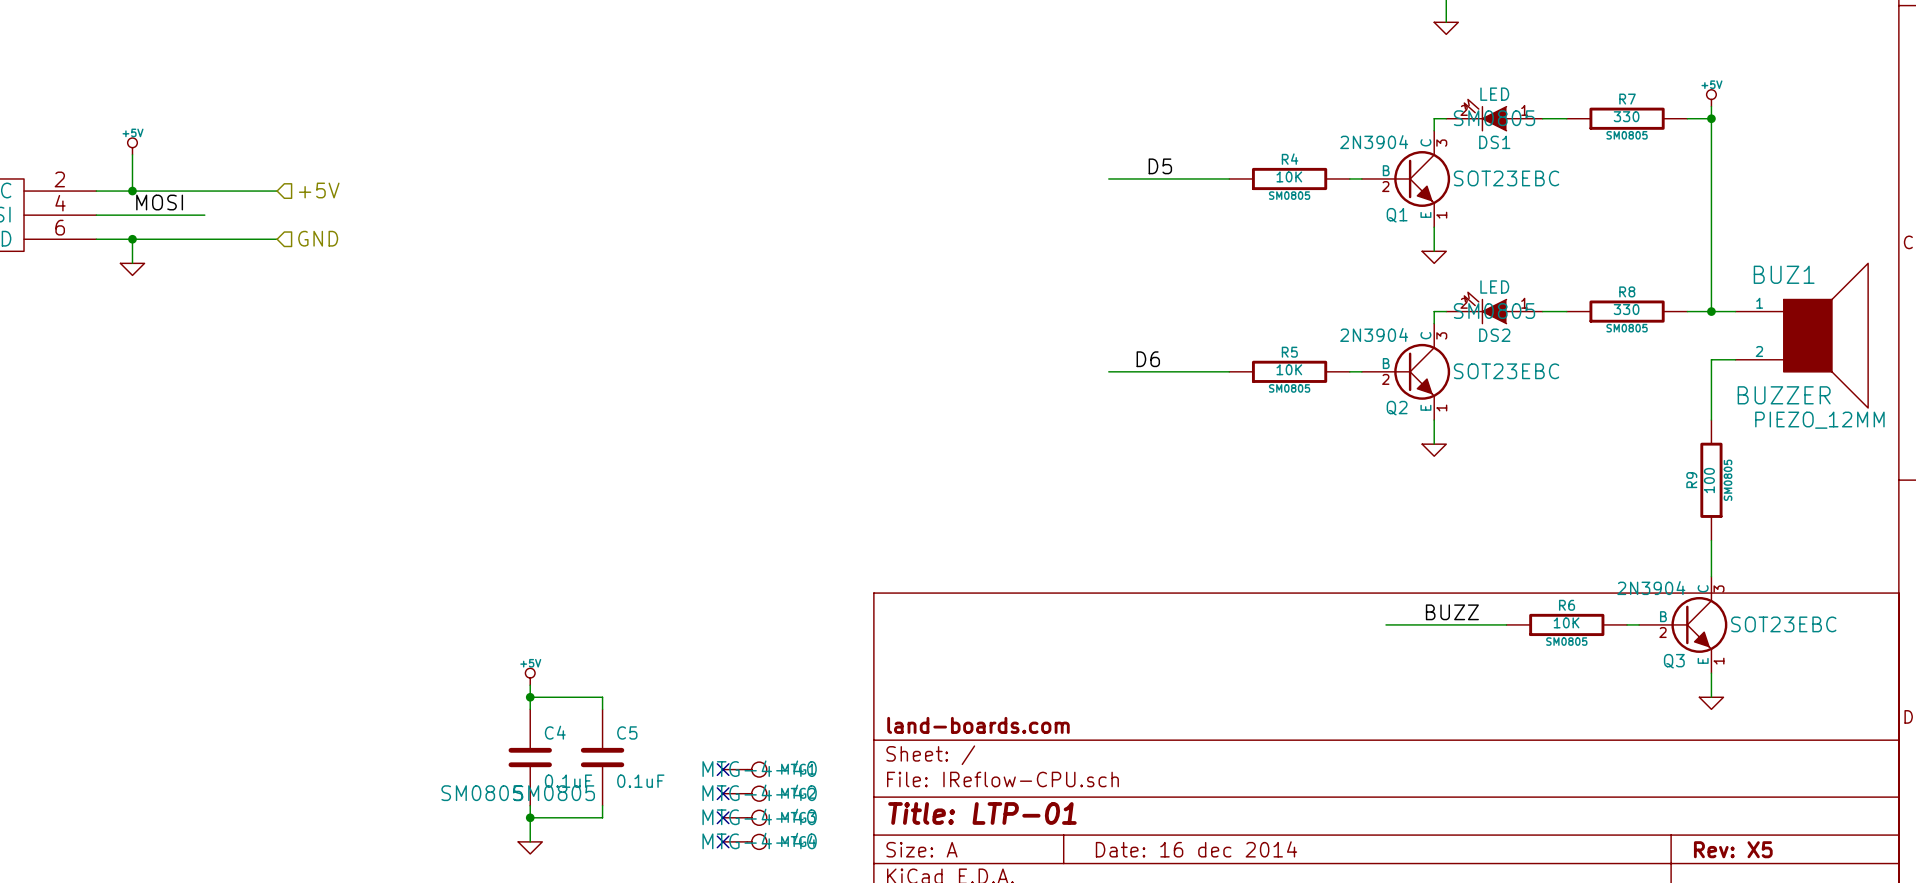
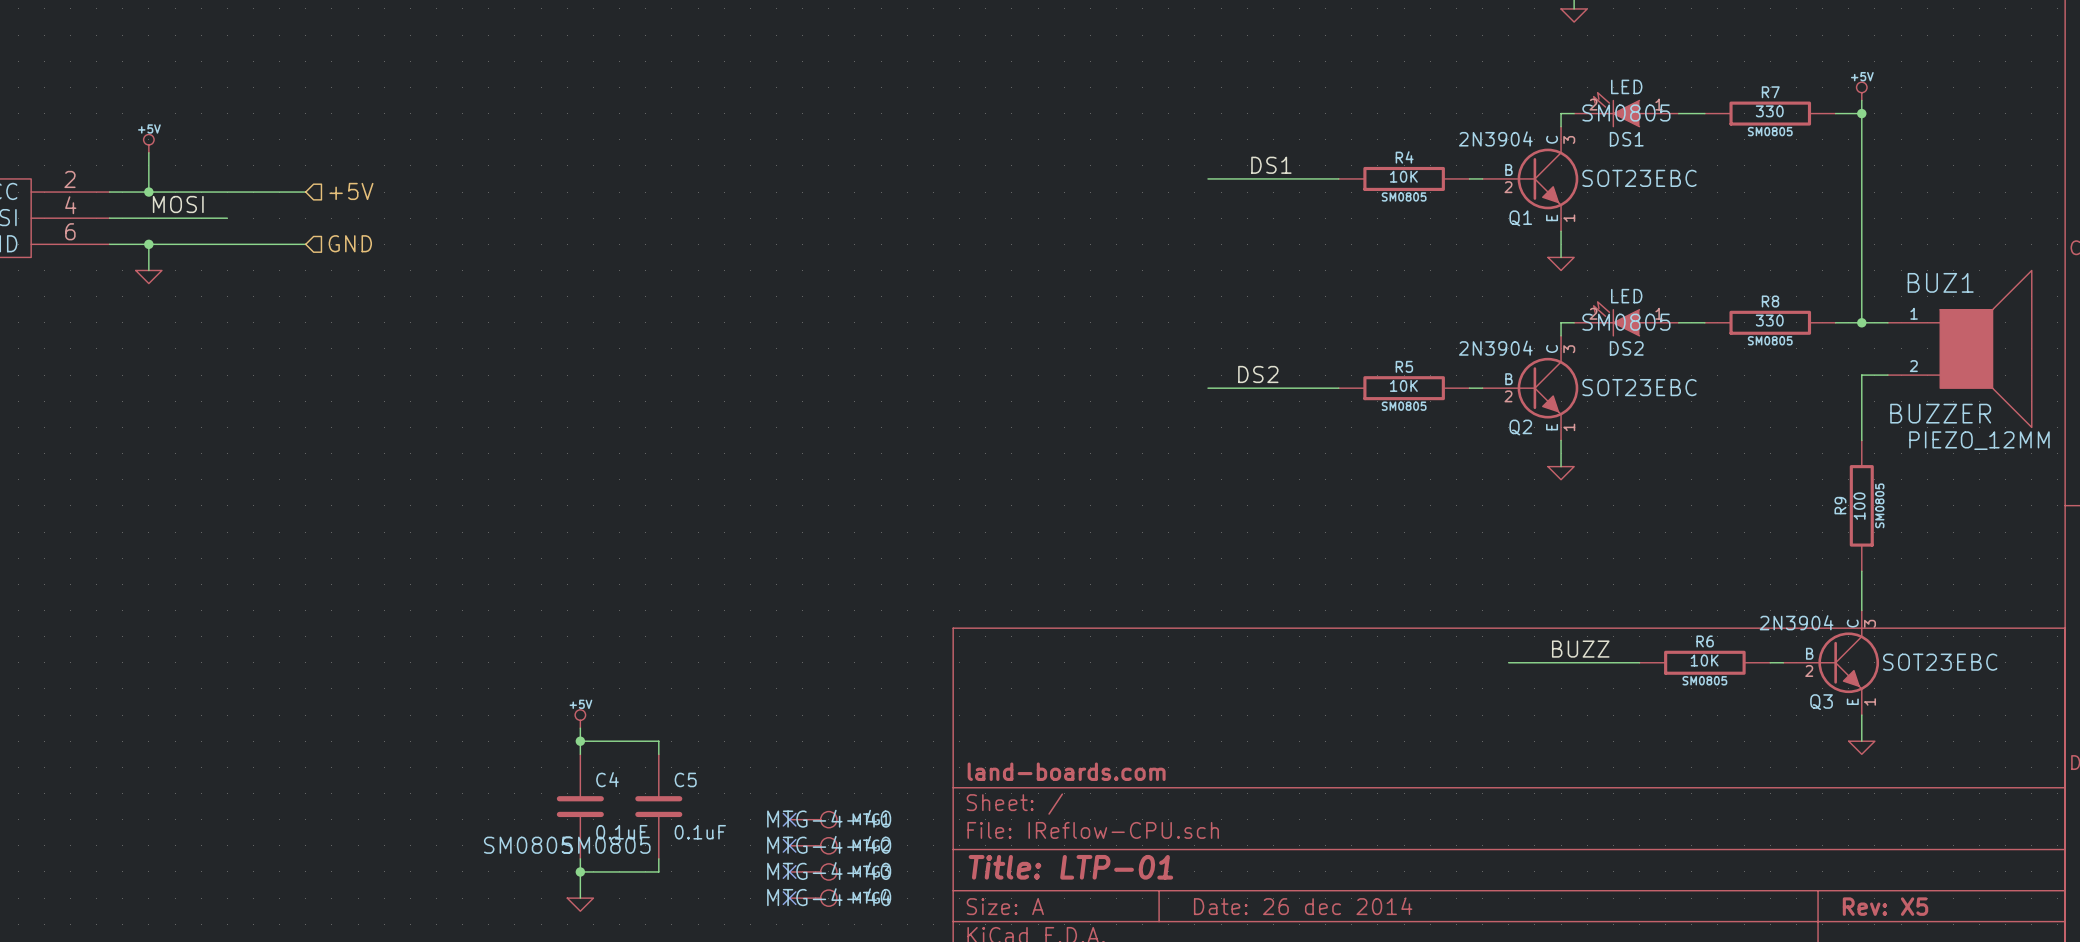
label: D5 (1160, 166) -> DS1 (1271, 165)
label: D6 (1148, 359) -> DS2 (1258, 374)
title block: Date: 16 dec 2014 (1196, 849) -> Date: 26 dec 2014 (1303, 906)

